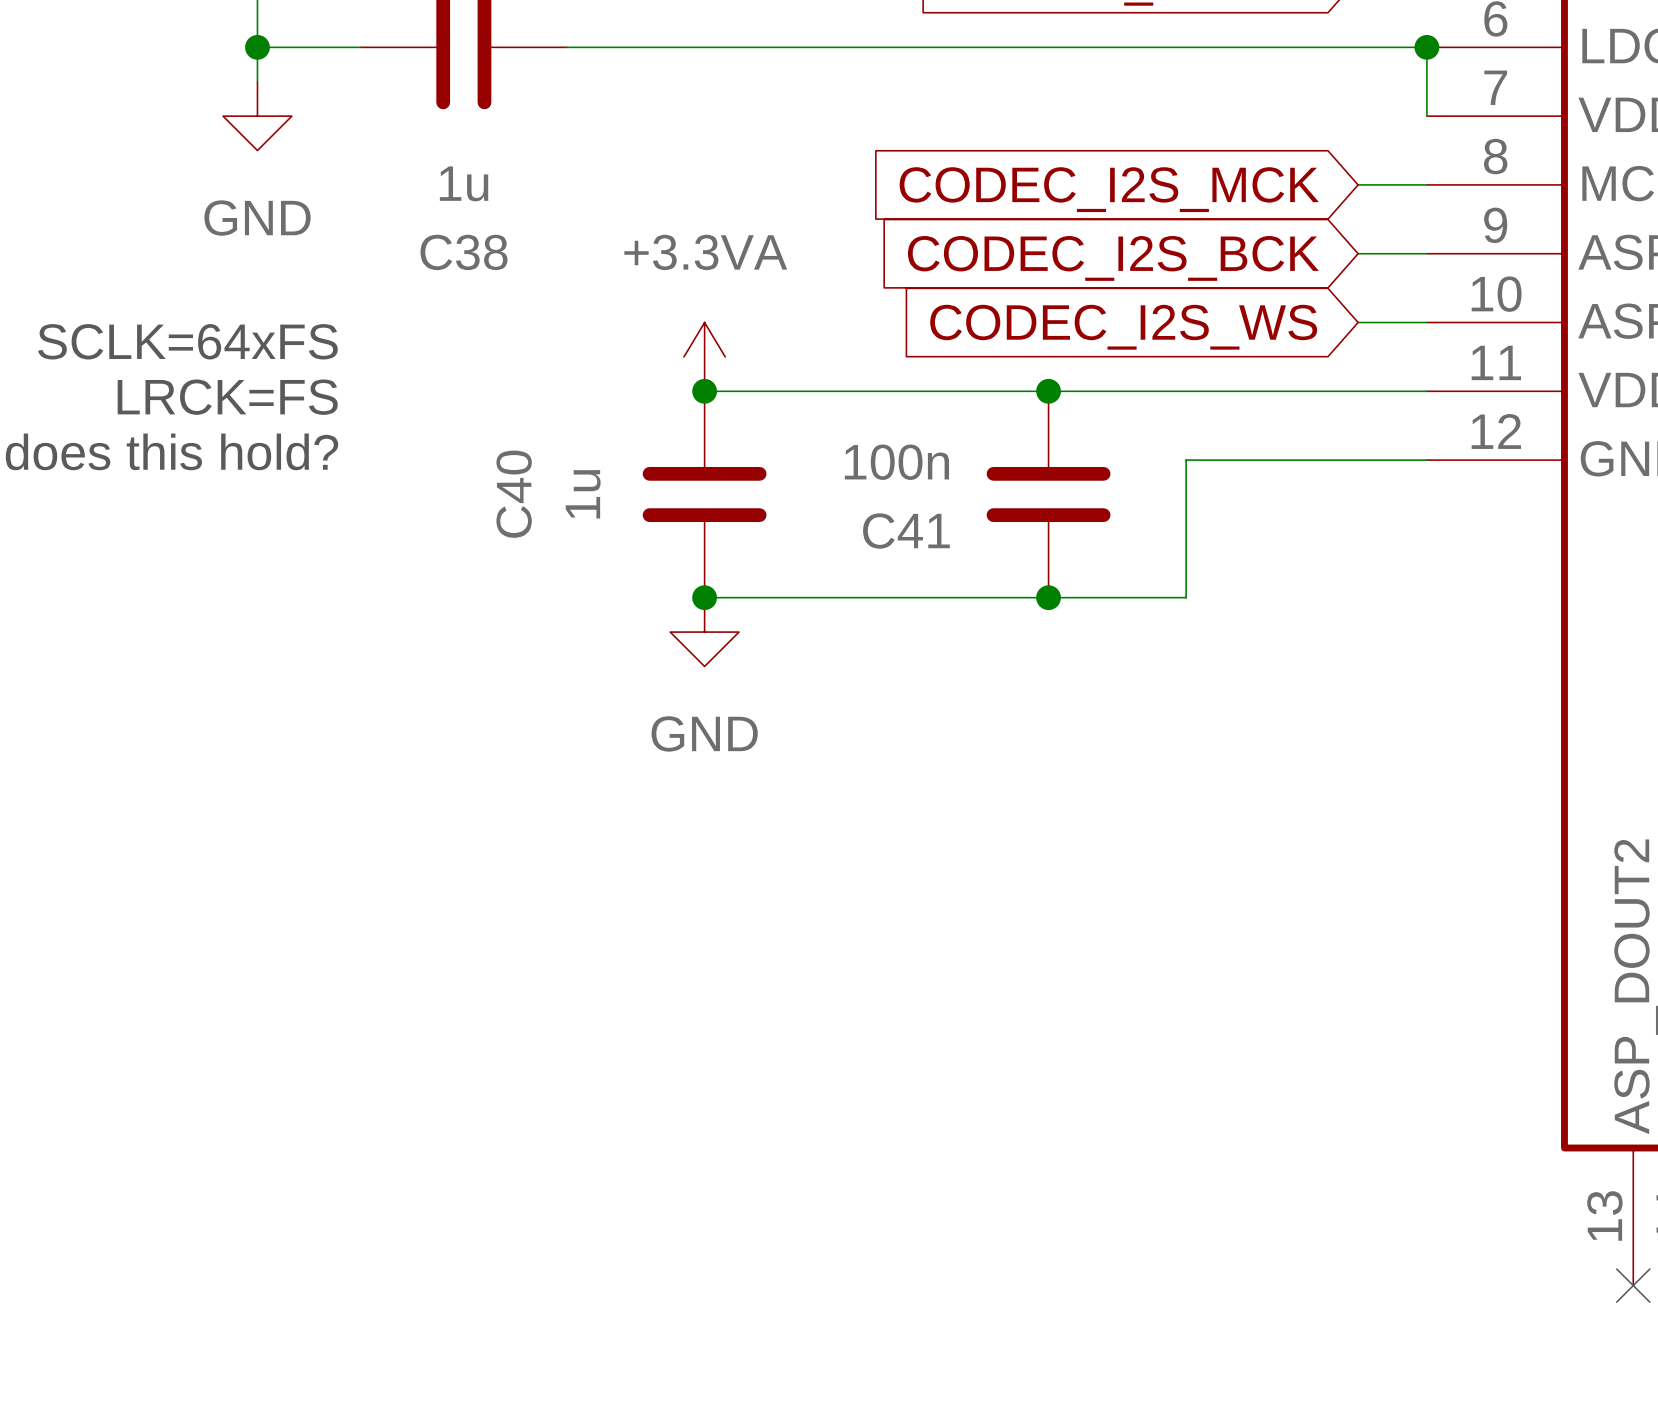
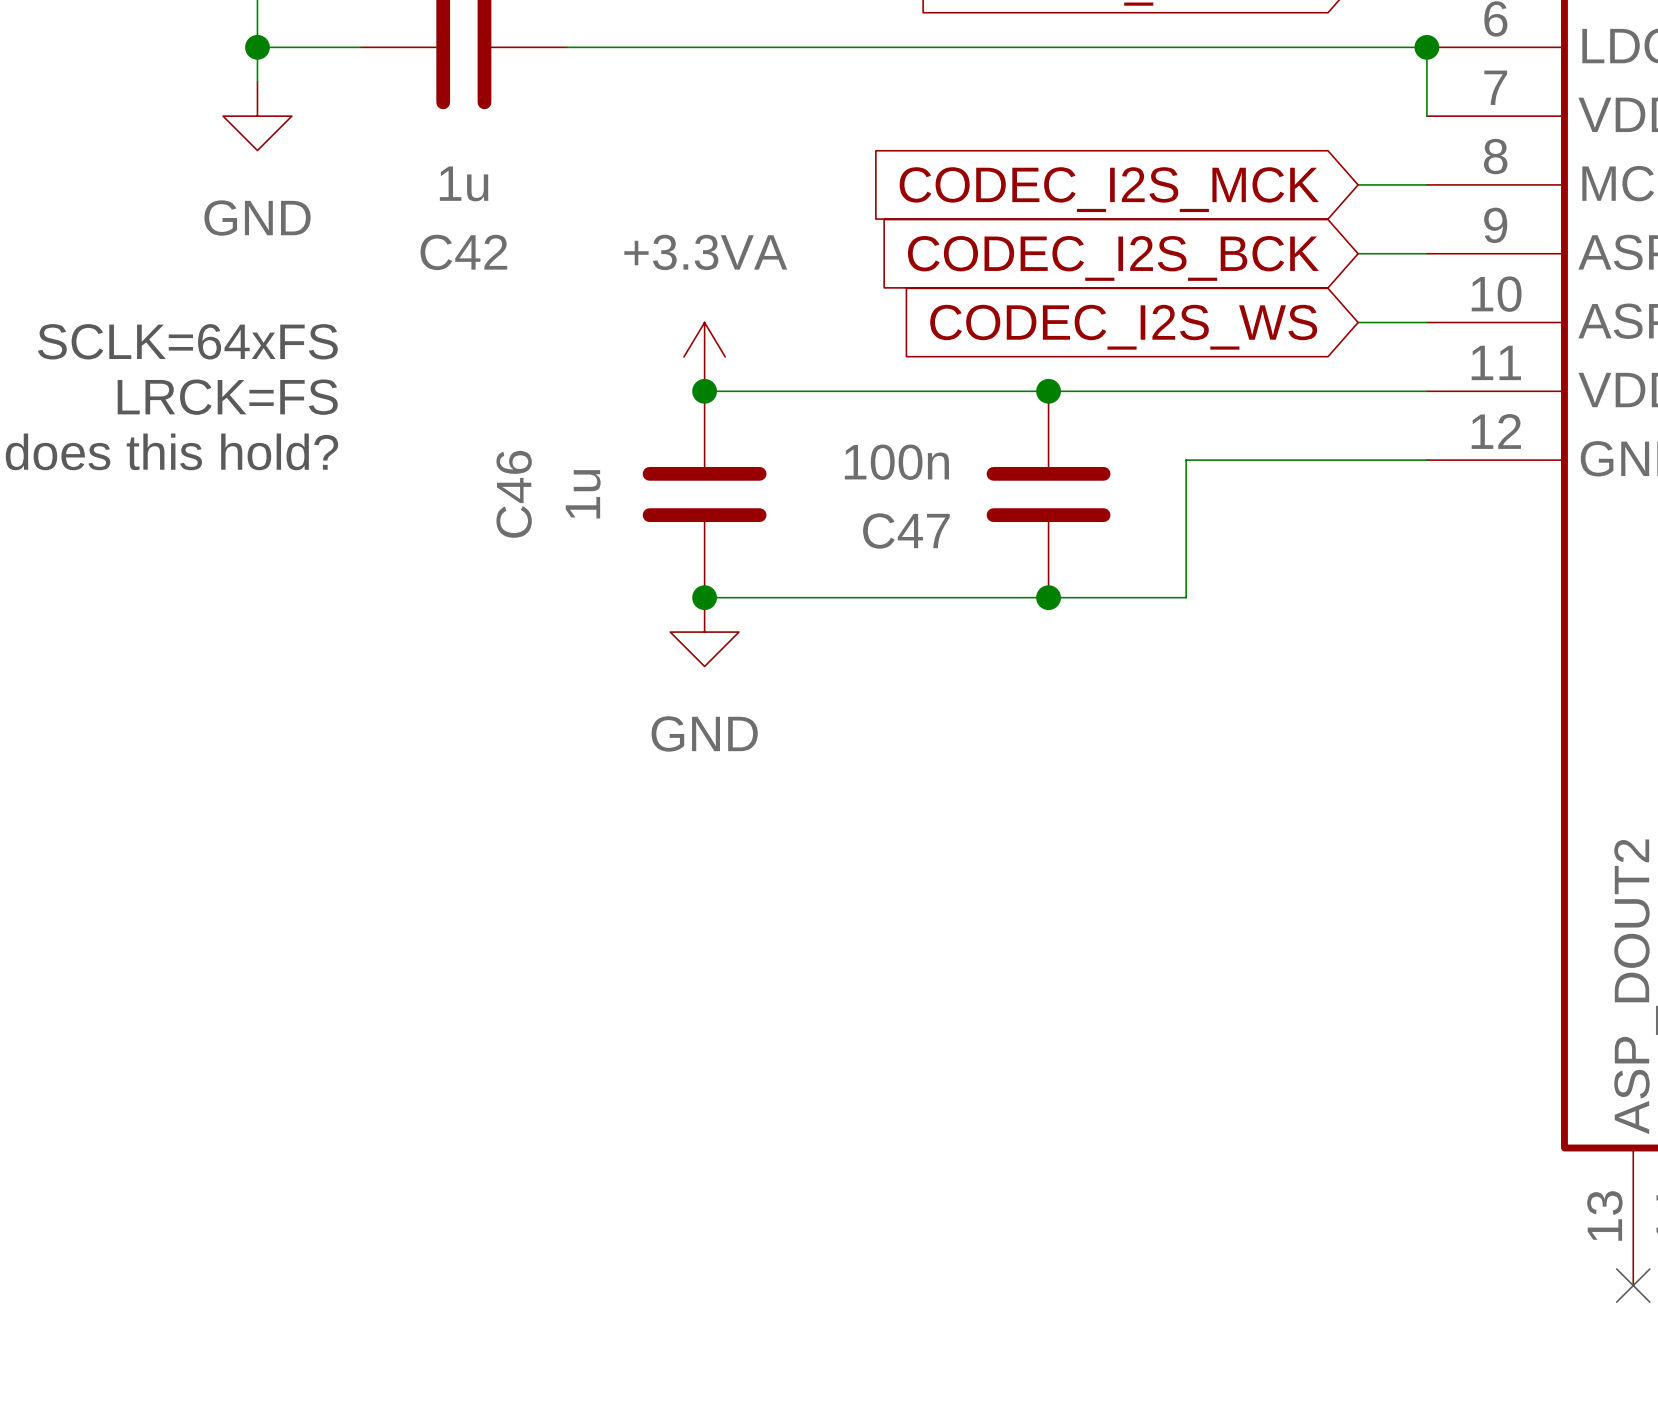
C38 name: C38 (464, 252) -> C42 (463, 252)
C40 name: C40 (514, 494) -> C46 (514, 494)
C41 name: C41 (906, 531) -> C47 (906, 531)

